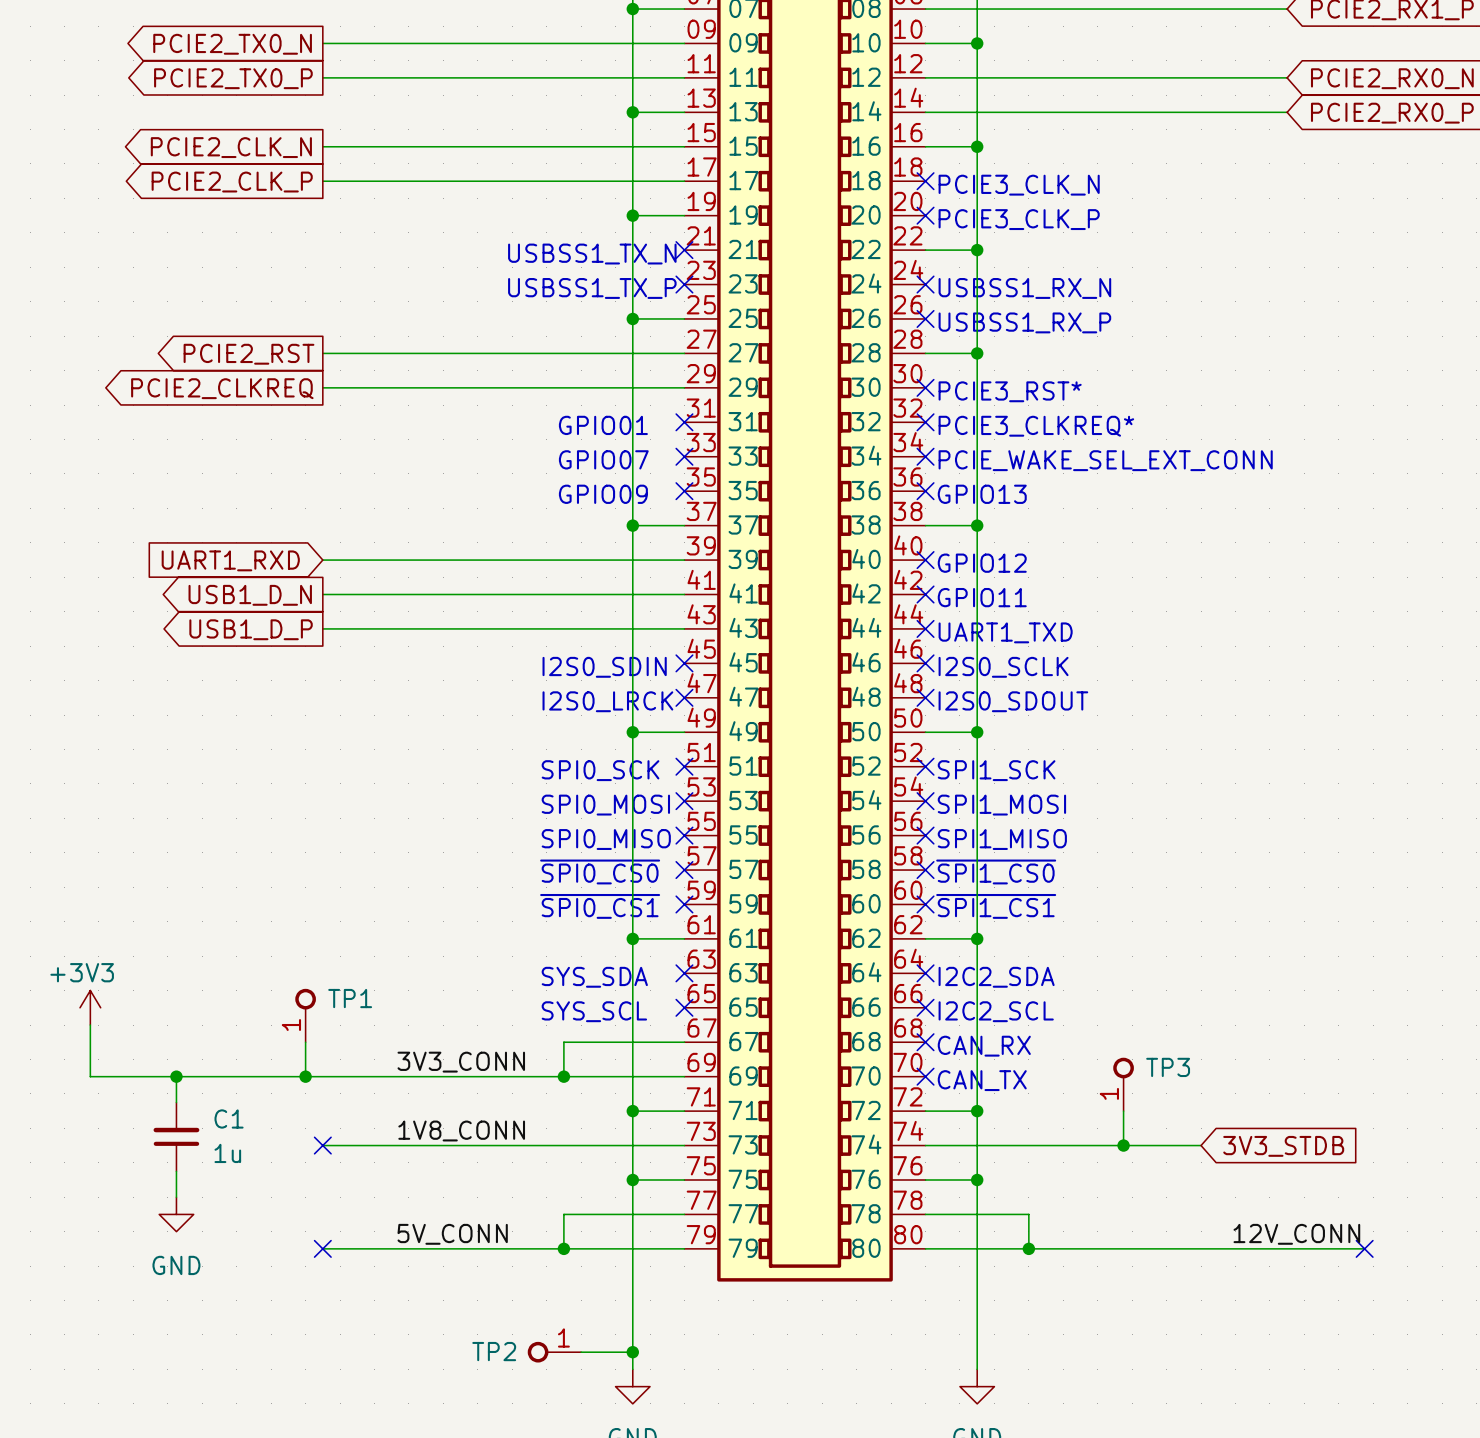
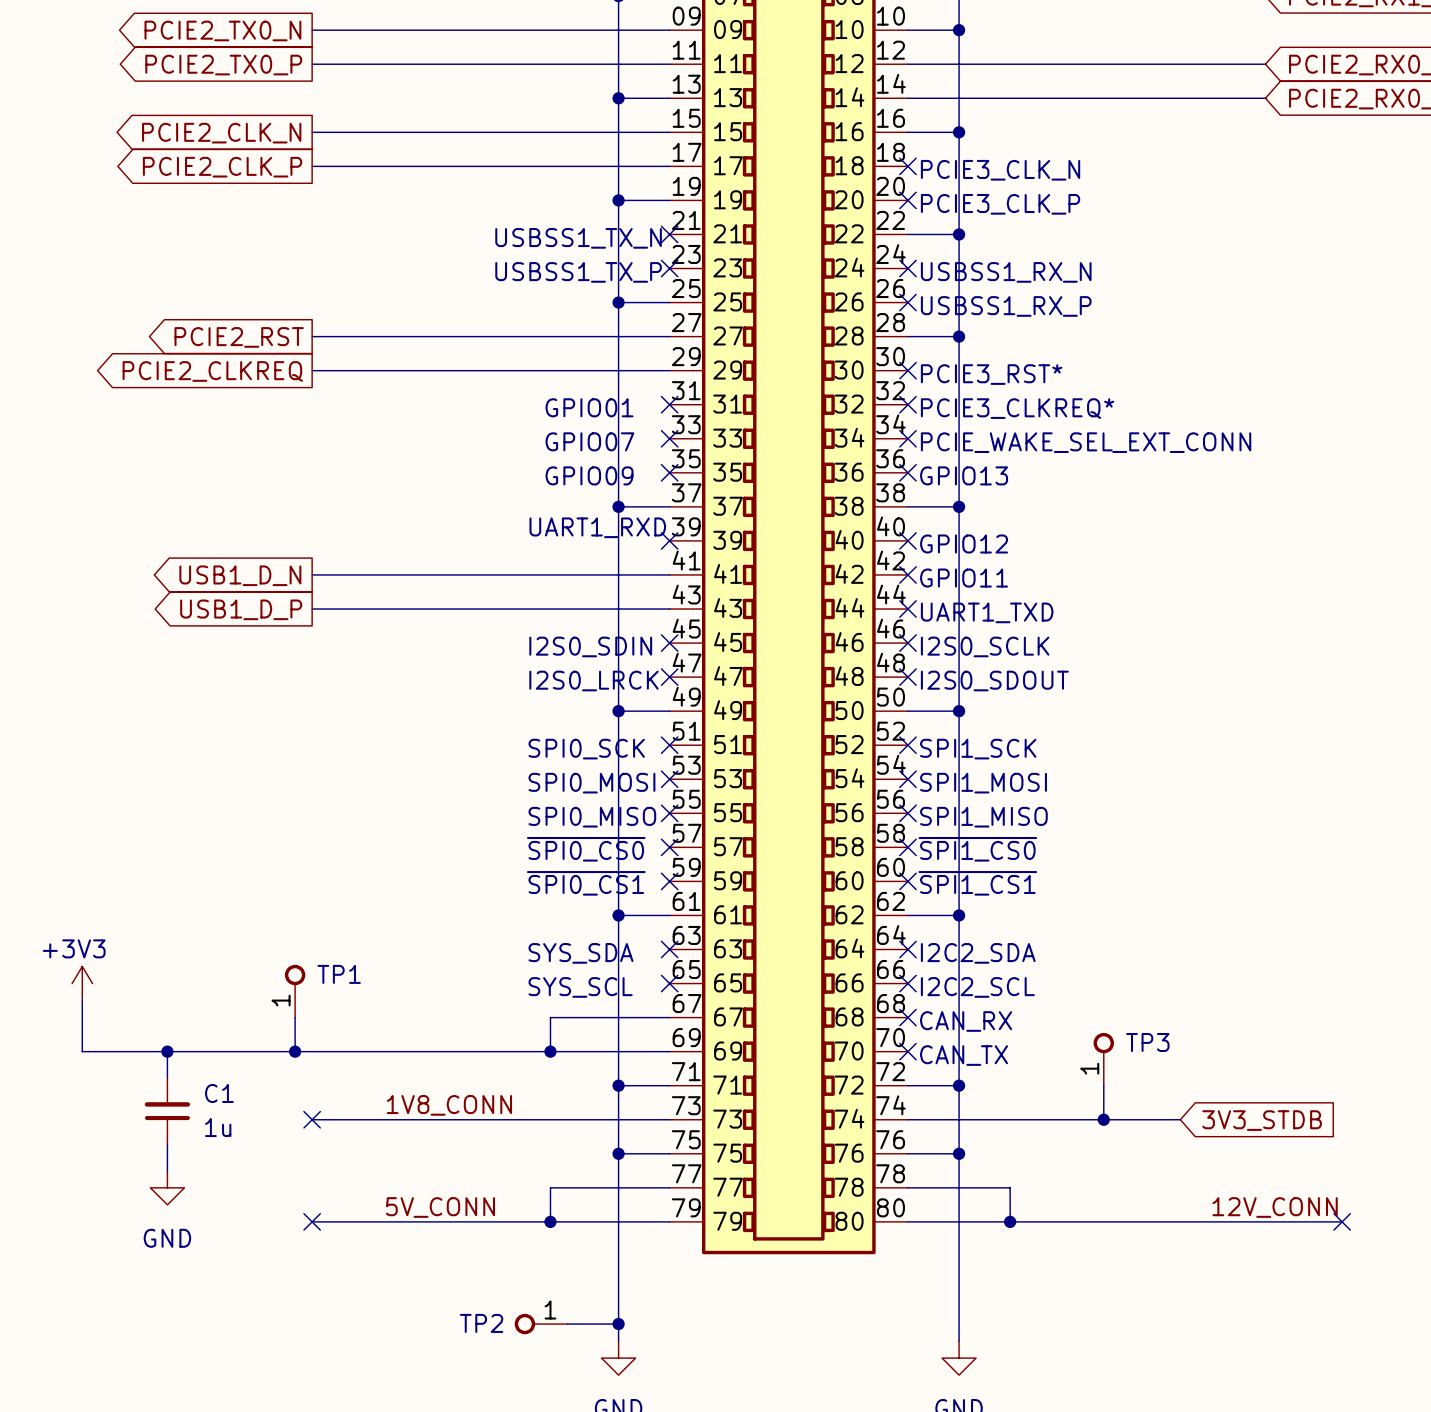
text: none -> UART1_RXD (597, 527)
global label: UART1_RXD (230, 560) -> none
wire: (322, 560) (684, 560) -> none
no-connect mark: none -> (669, 540)
label: 3V3_CONN (461, 1062) -> none

